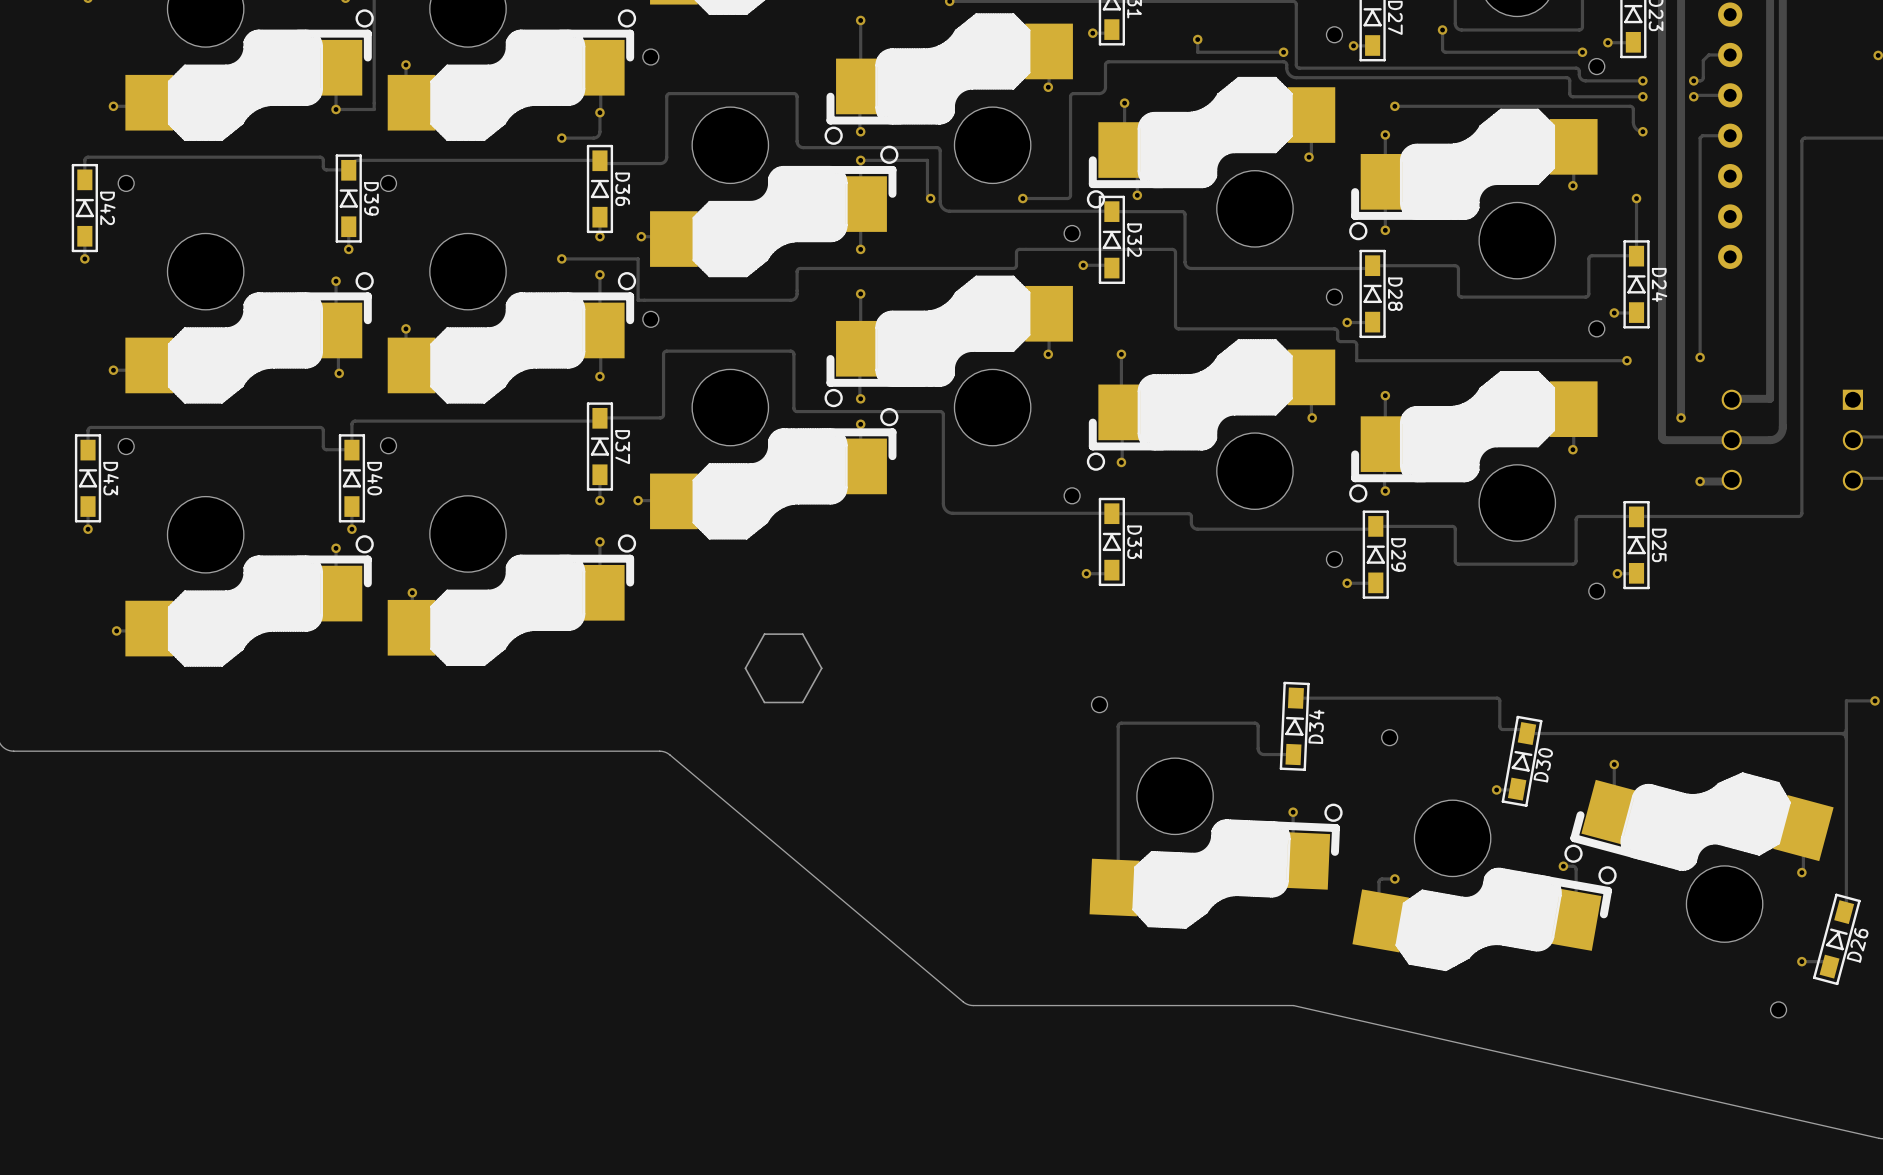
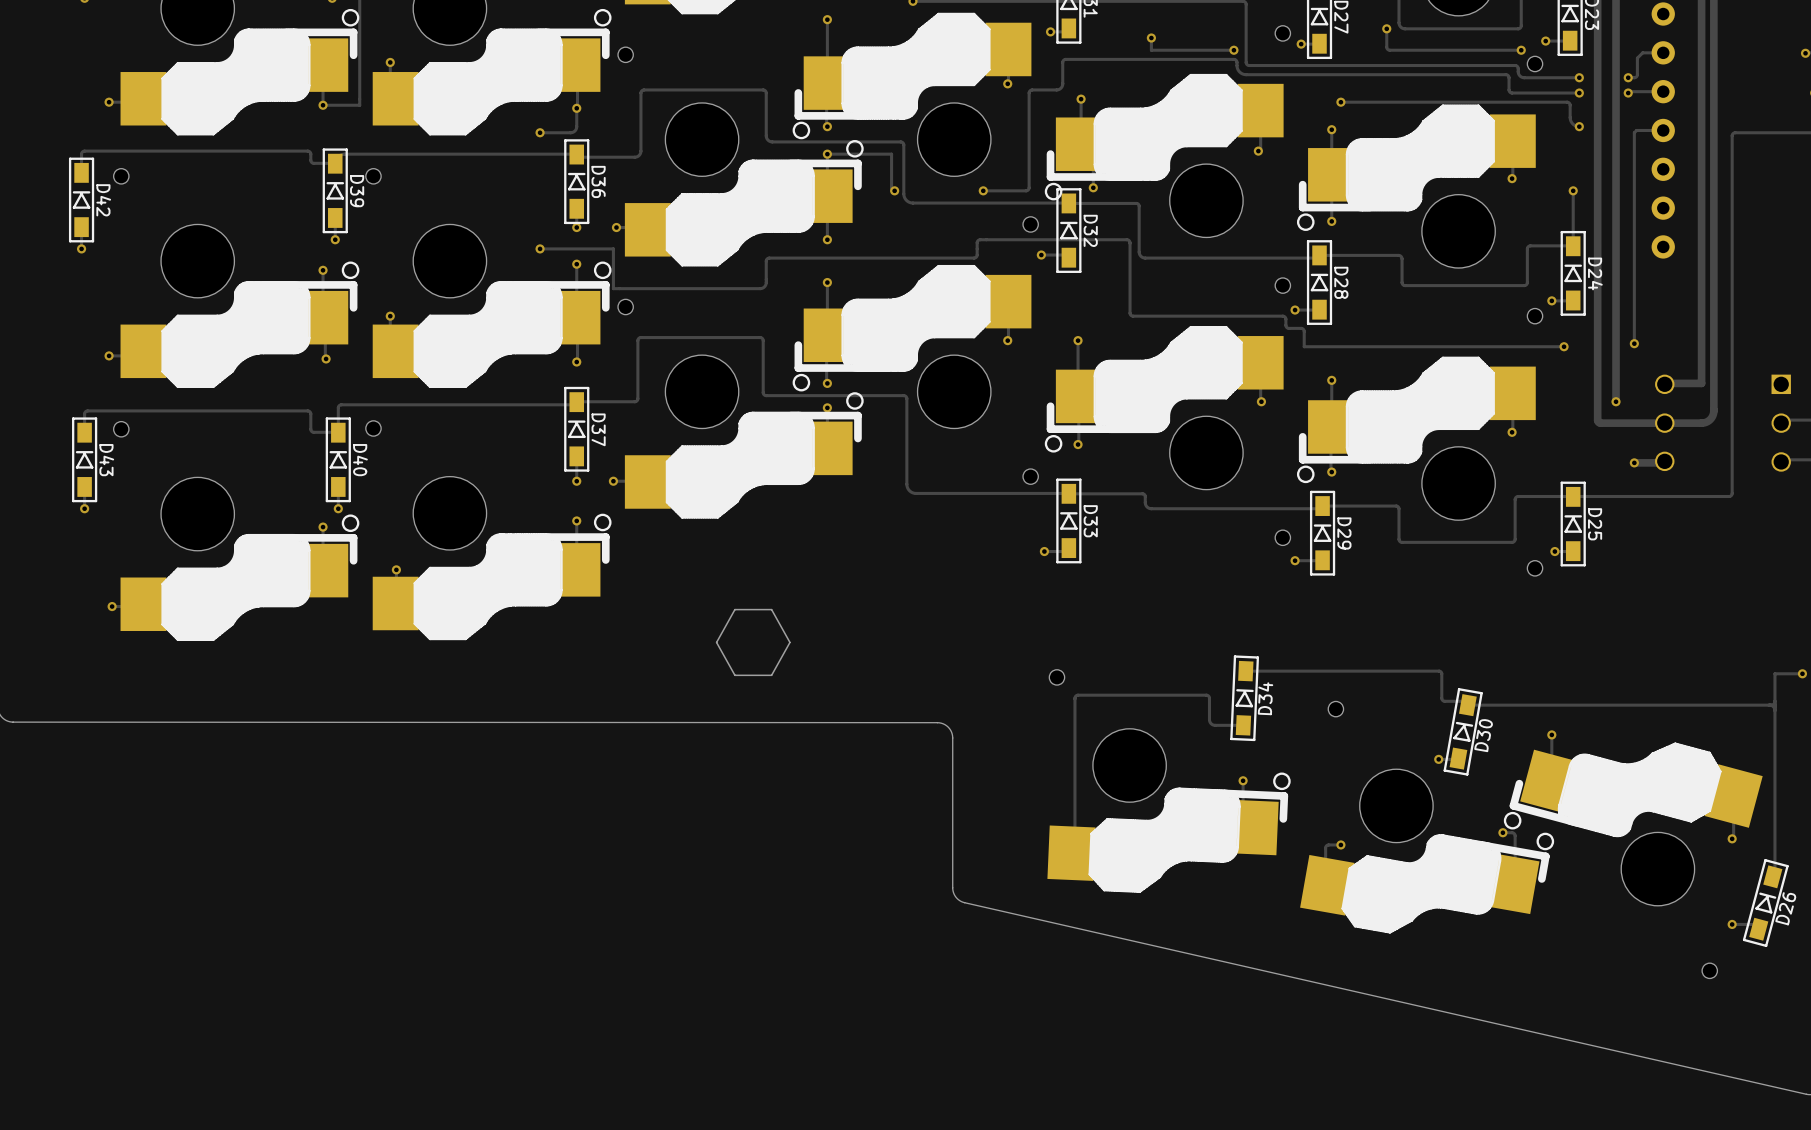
board edge: (13, 751) (663, 751) (669, 754) (967, 1004) (1293, 1005) (1879, 1138) -> (13, 722) (941, 723) (948, 727) (952, 735) (952, 887) (955, 895) (961, 901) (1806, 1094)

